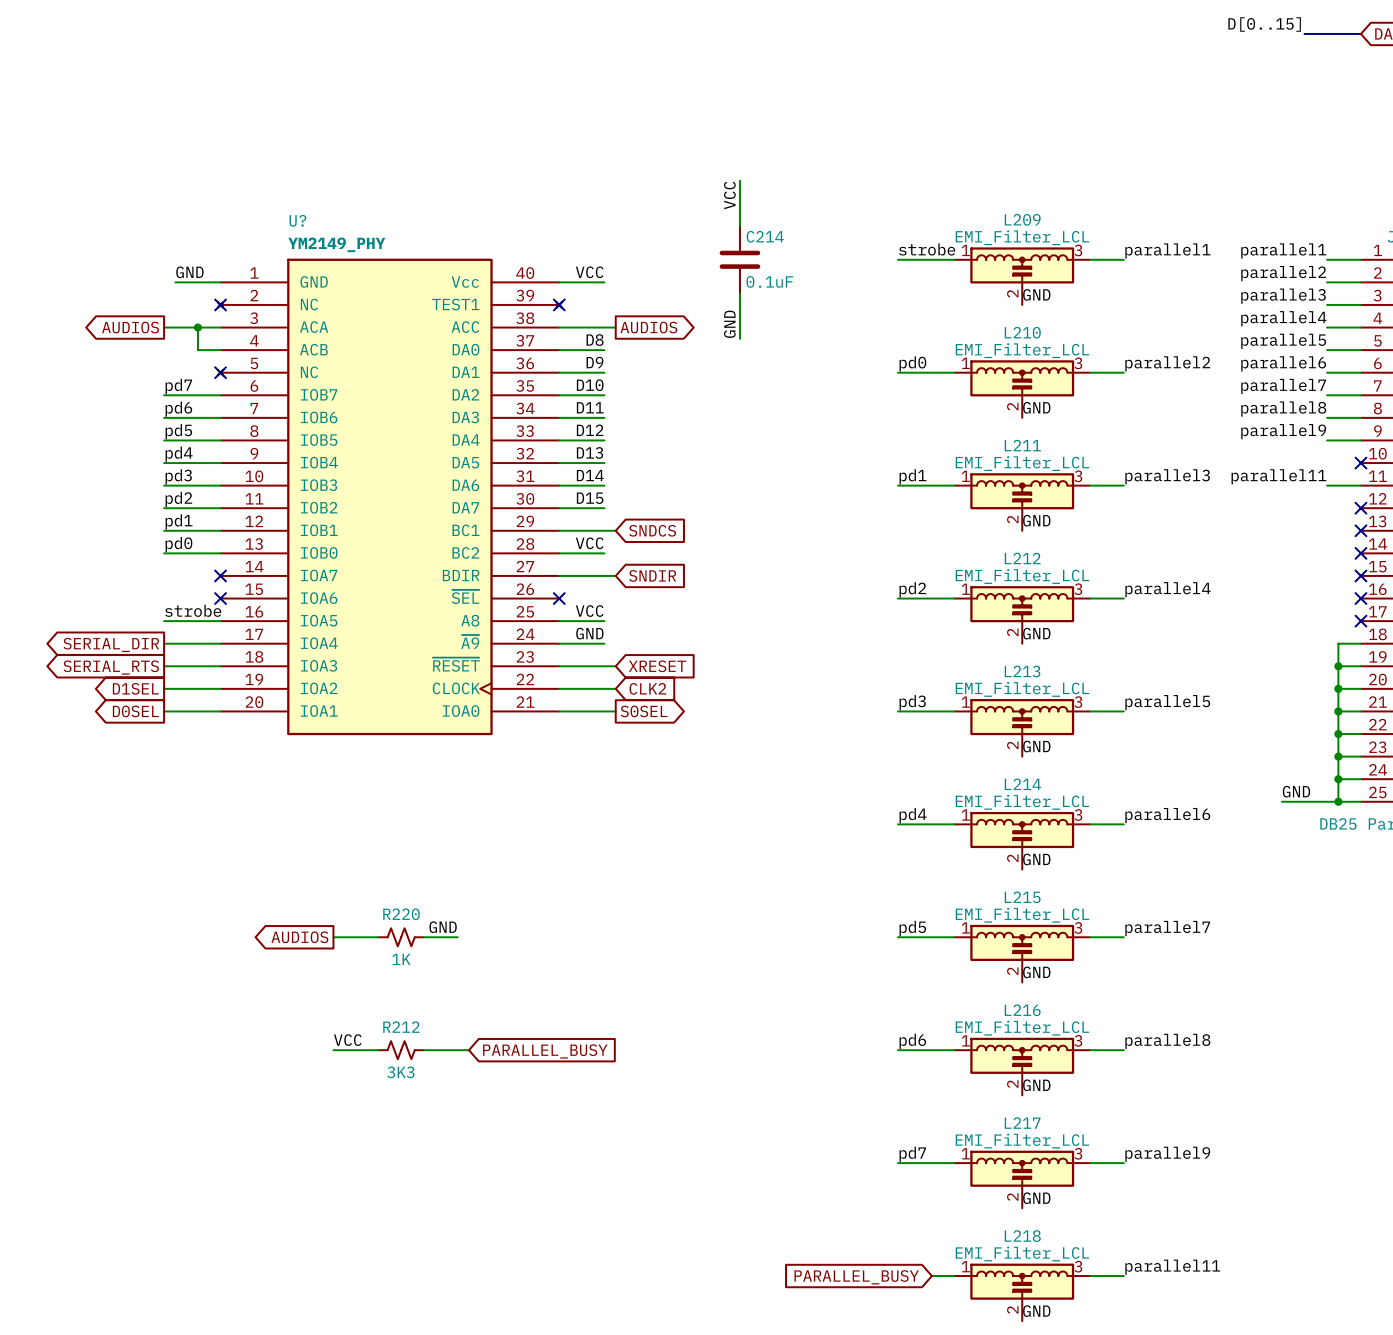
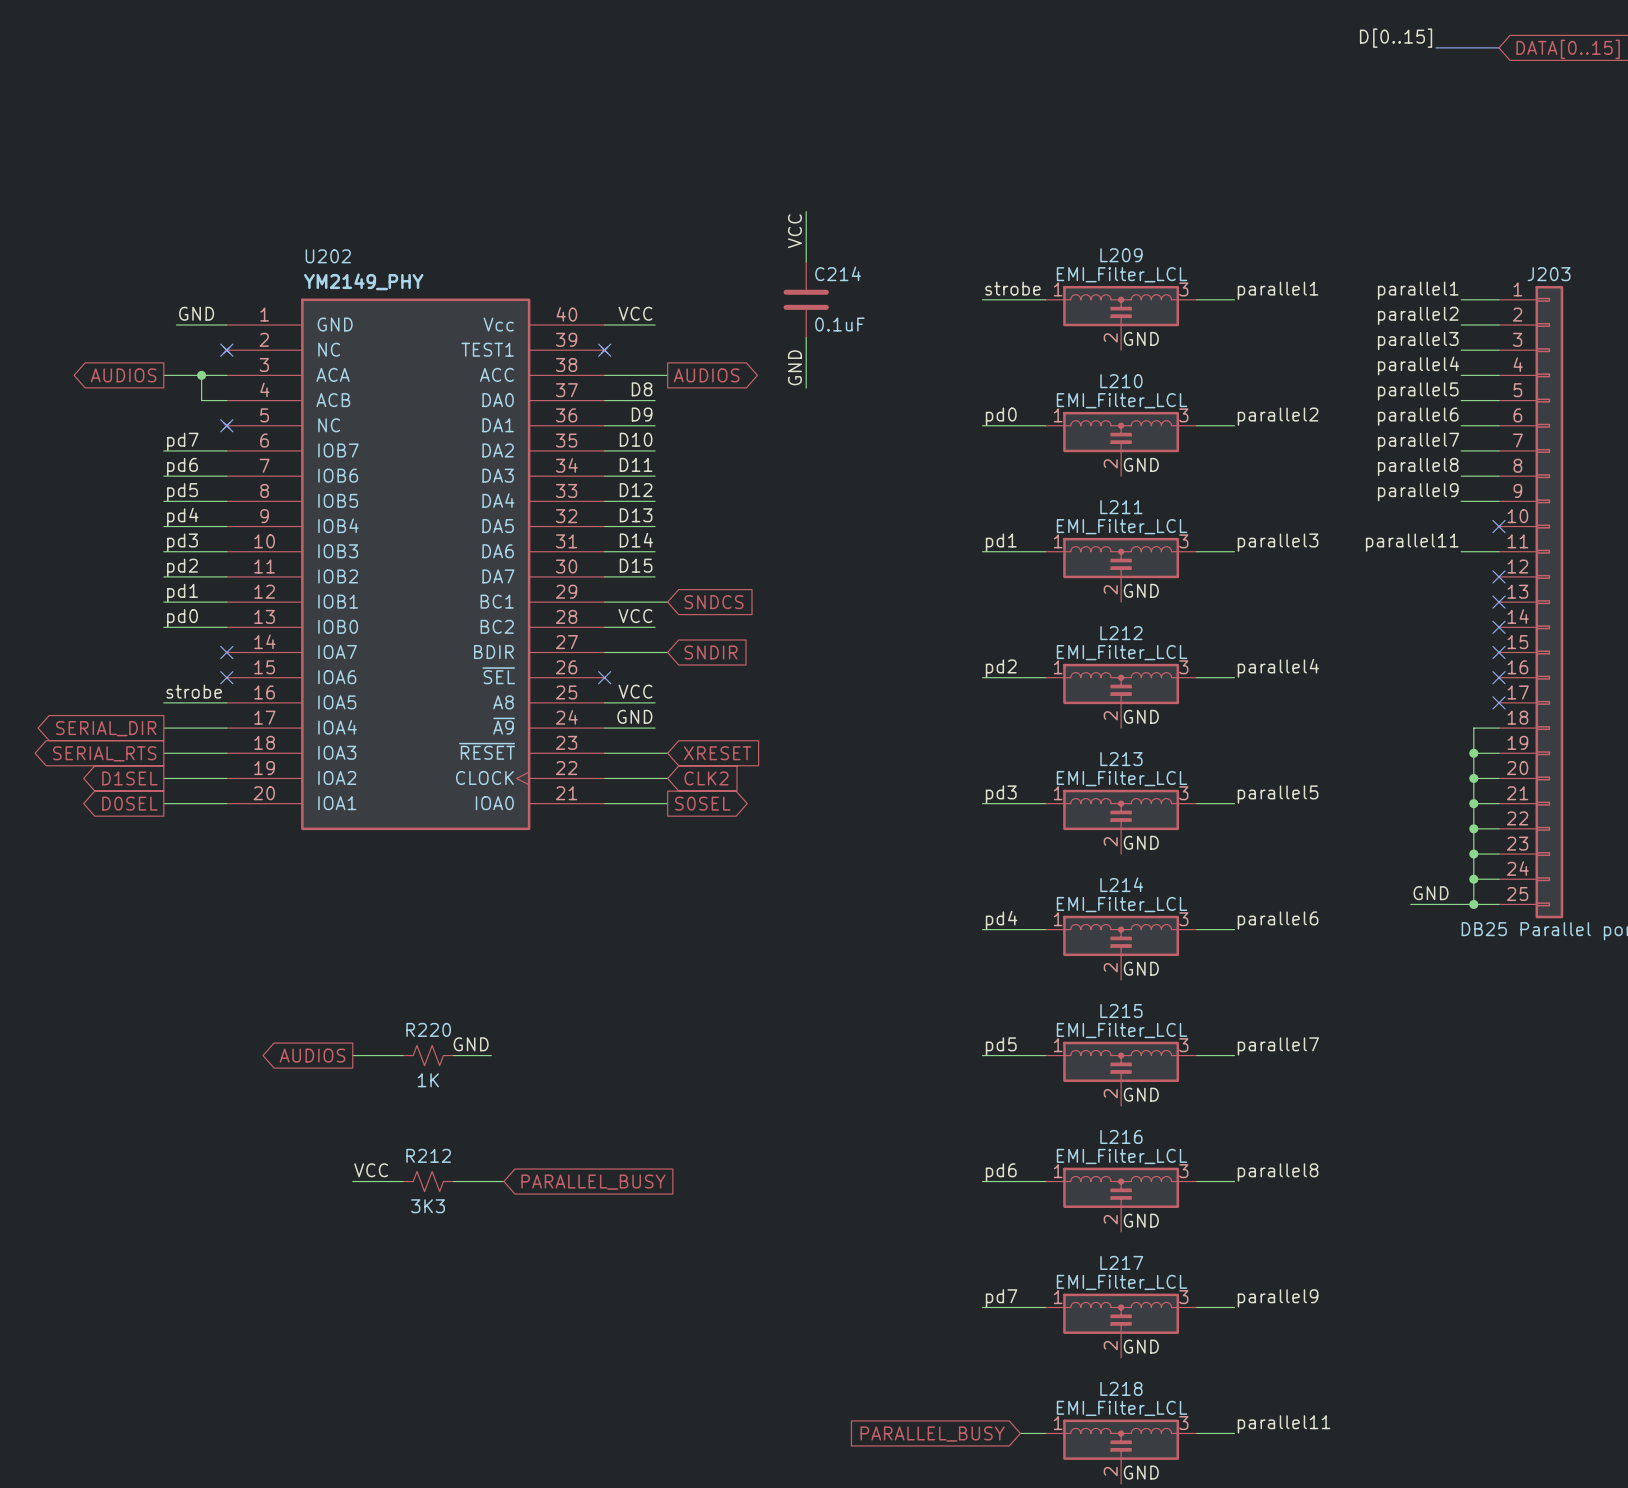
U? name: U? (297, 220) -> U202 (328, 256)

